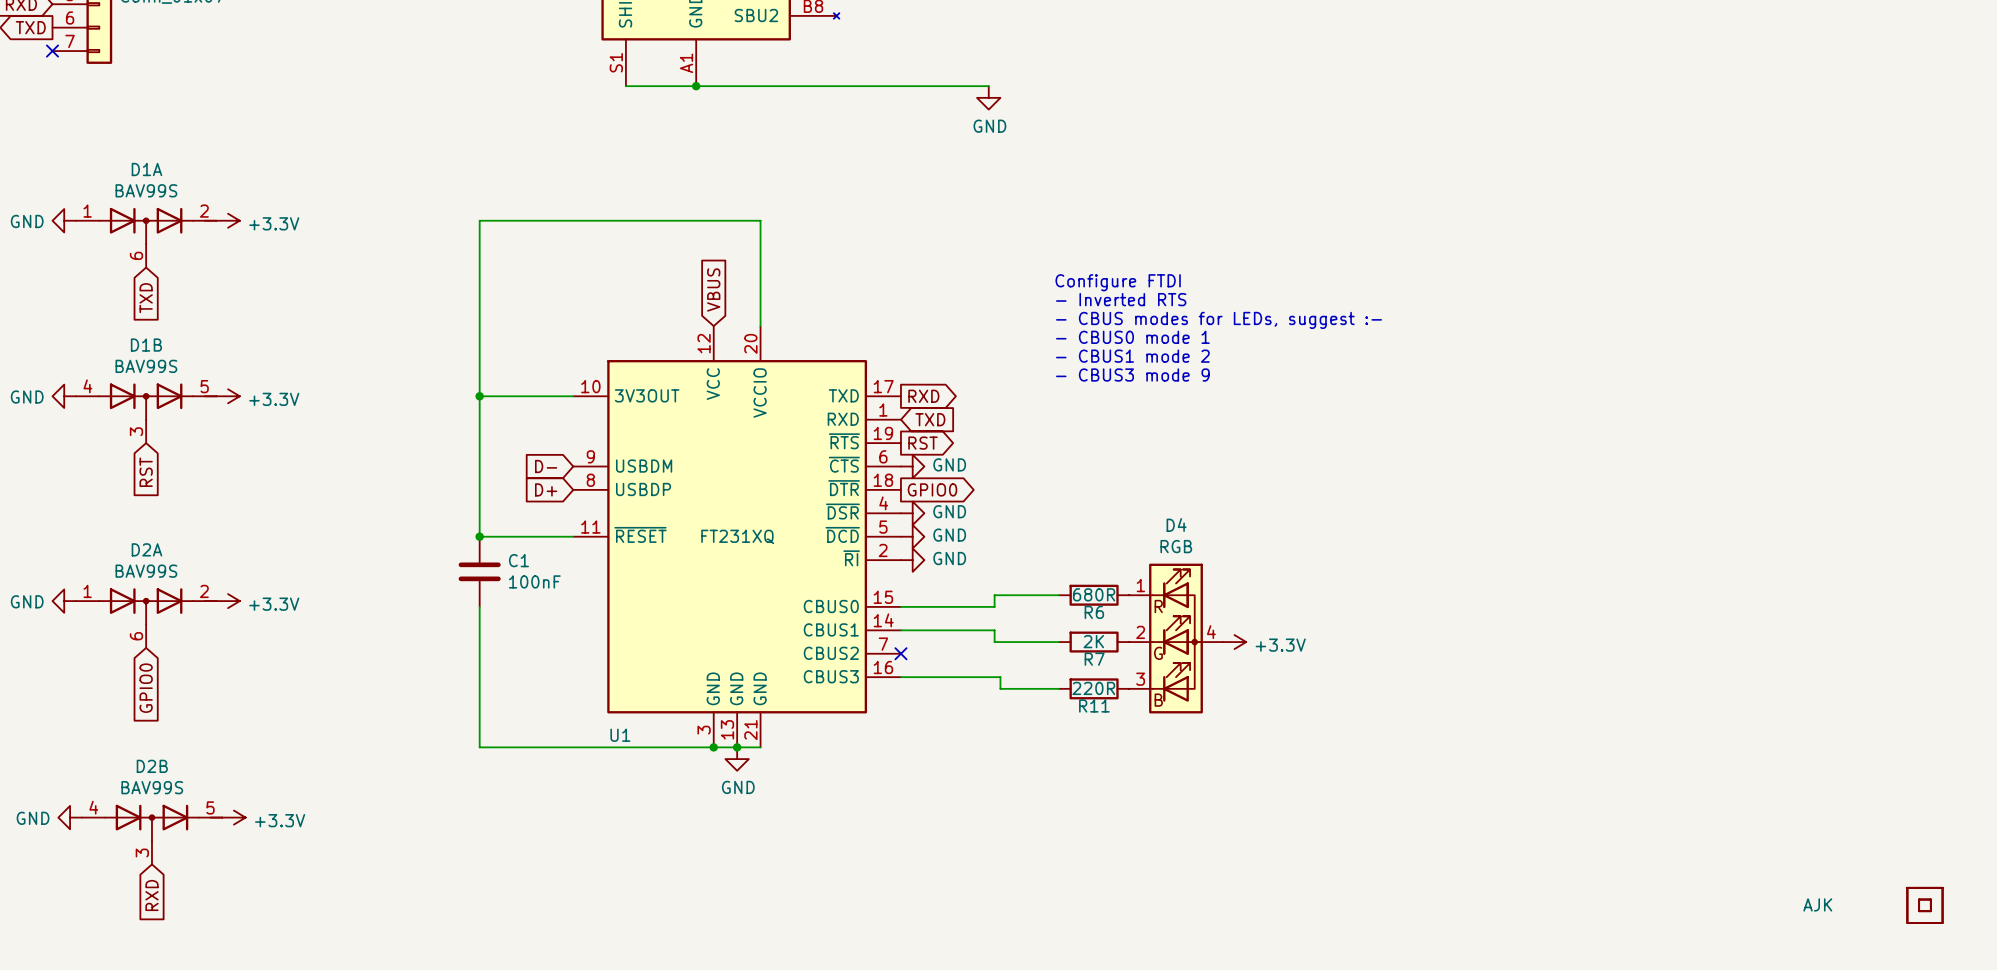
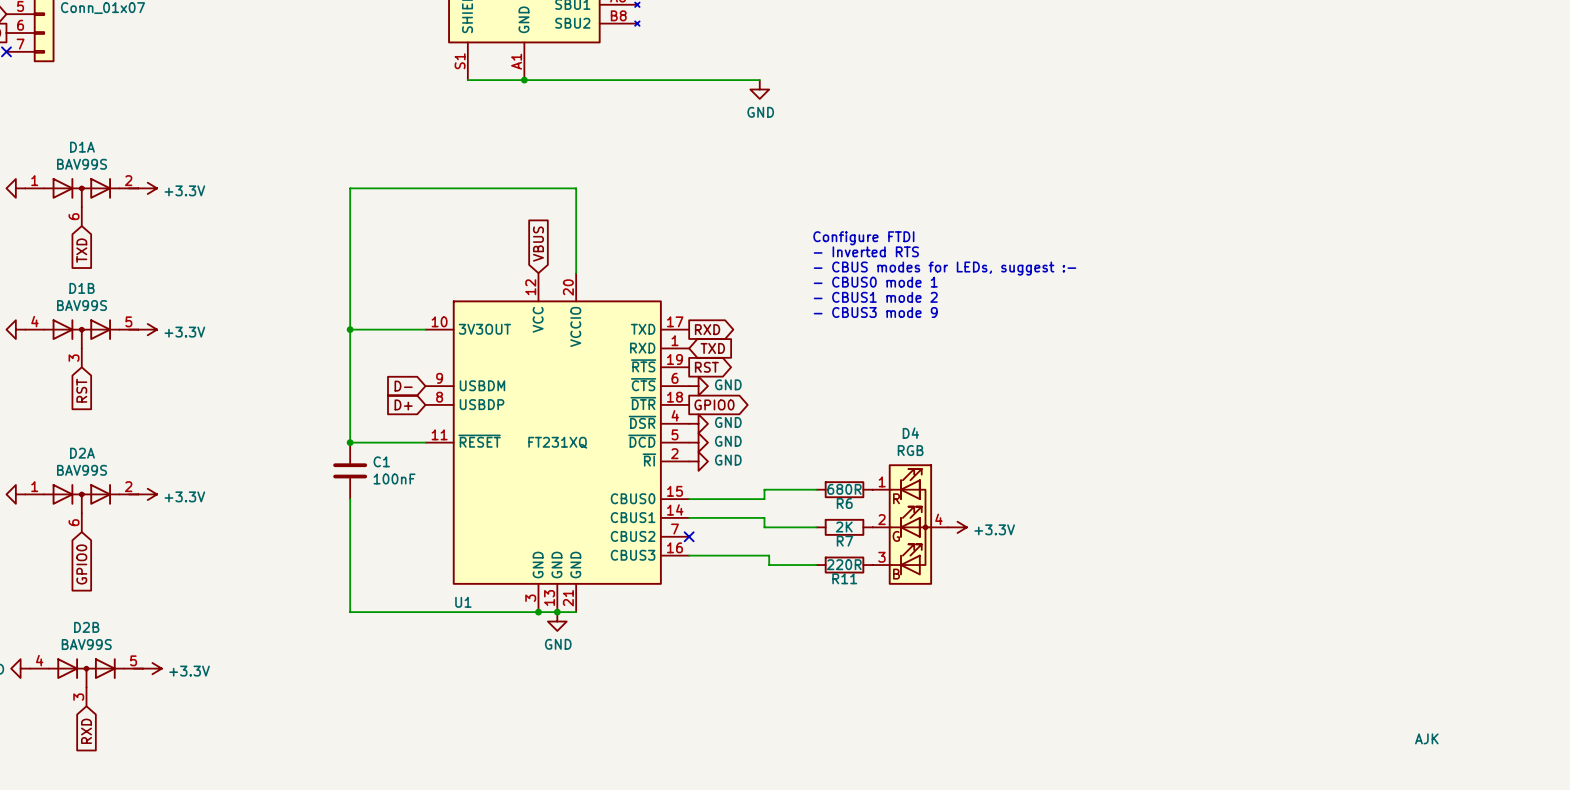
part: (1924, 905) -> none

